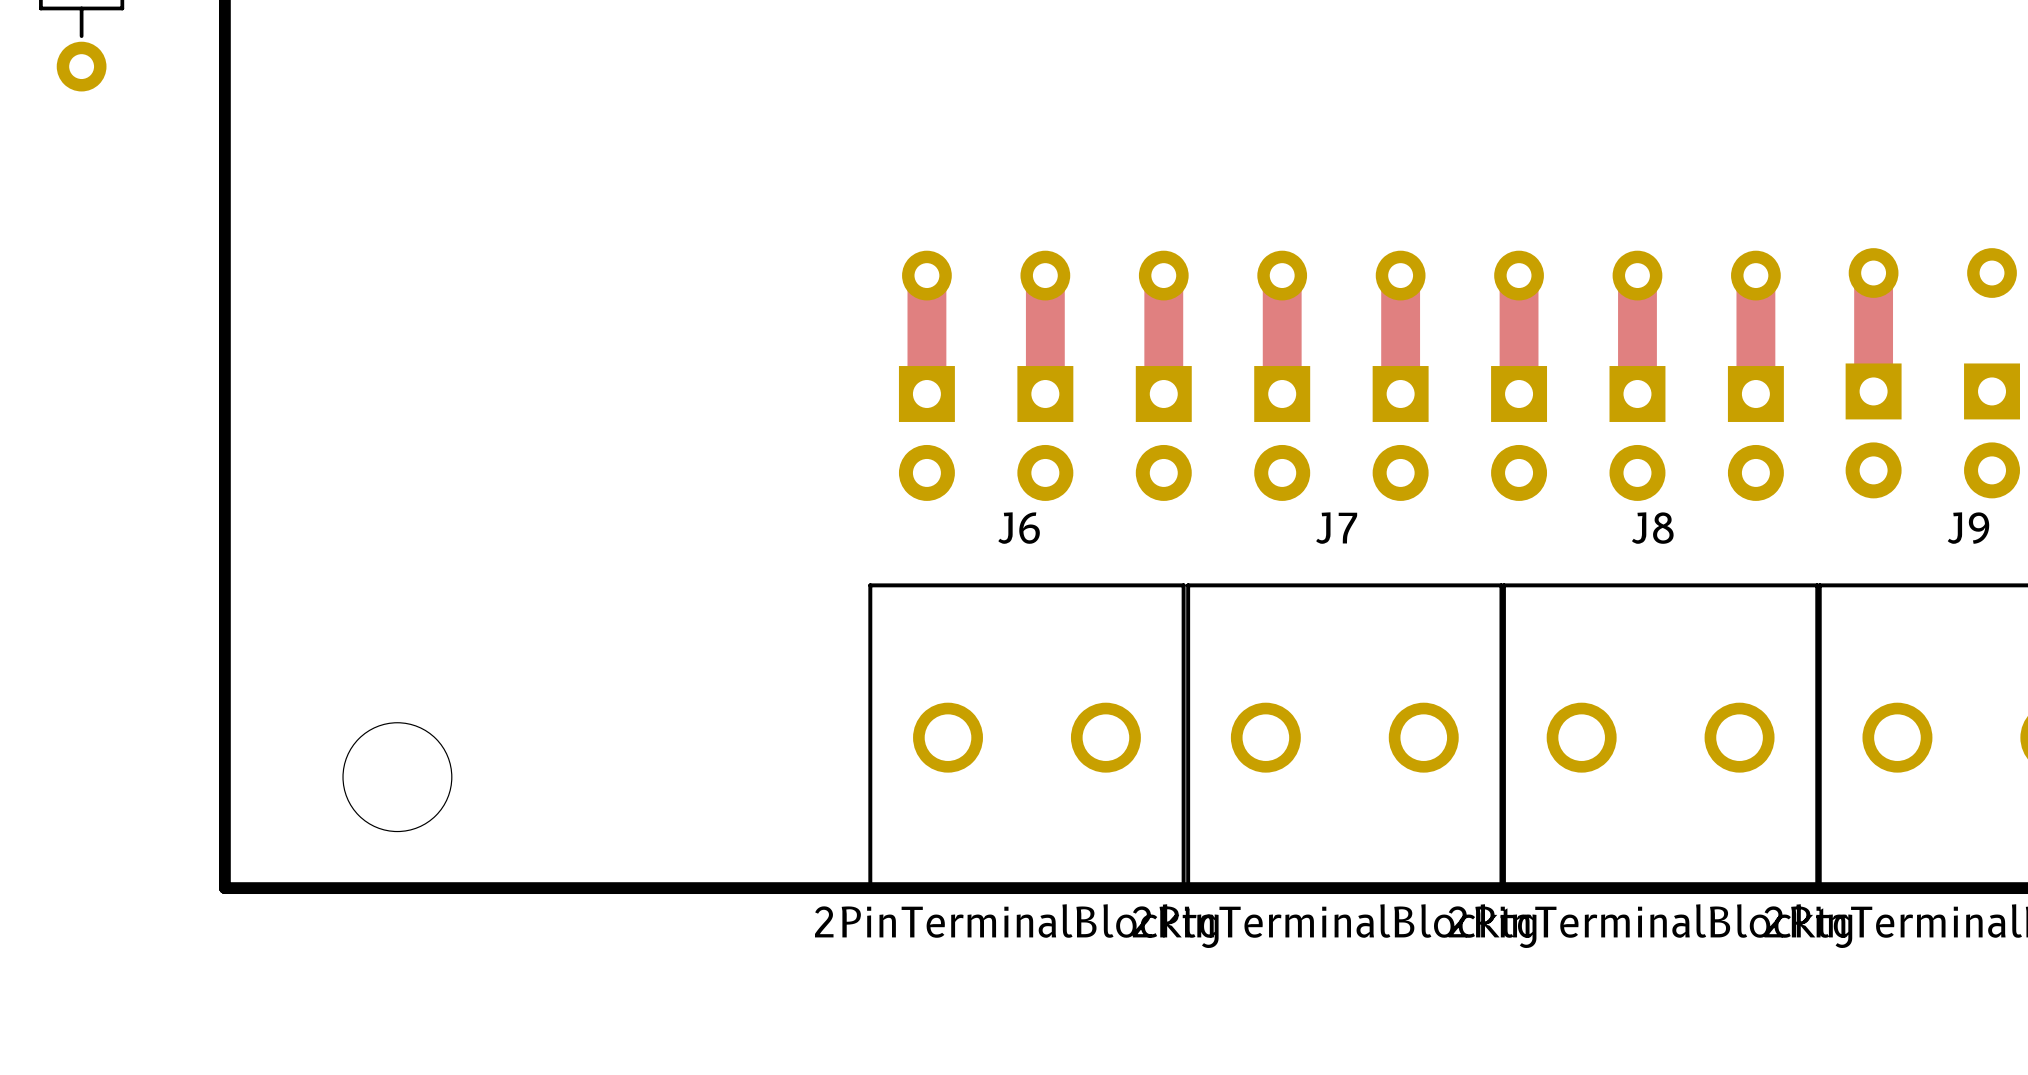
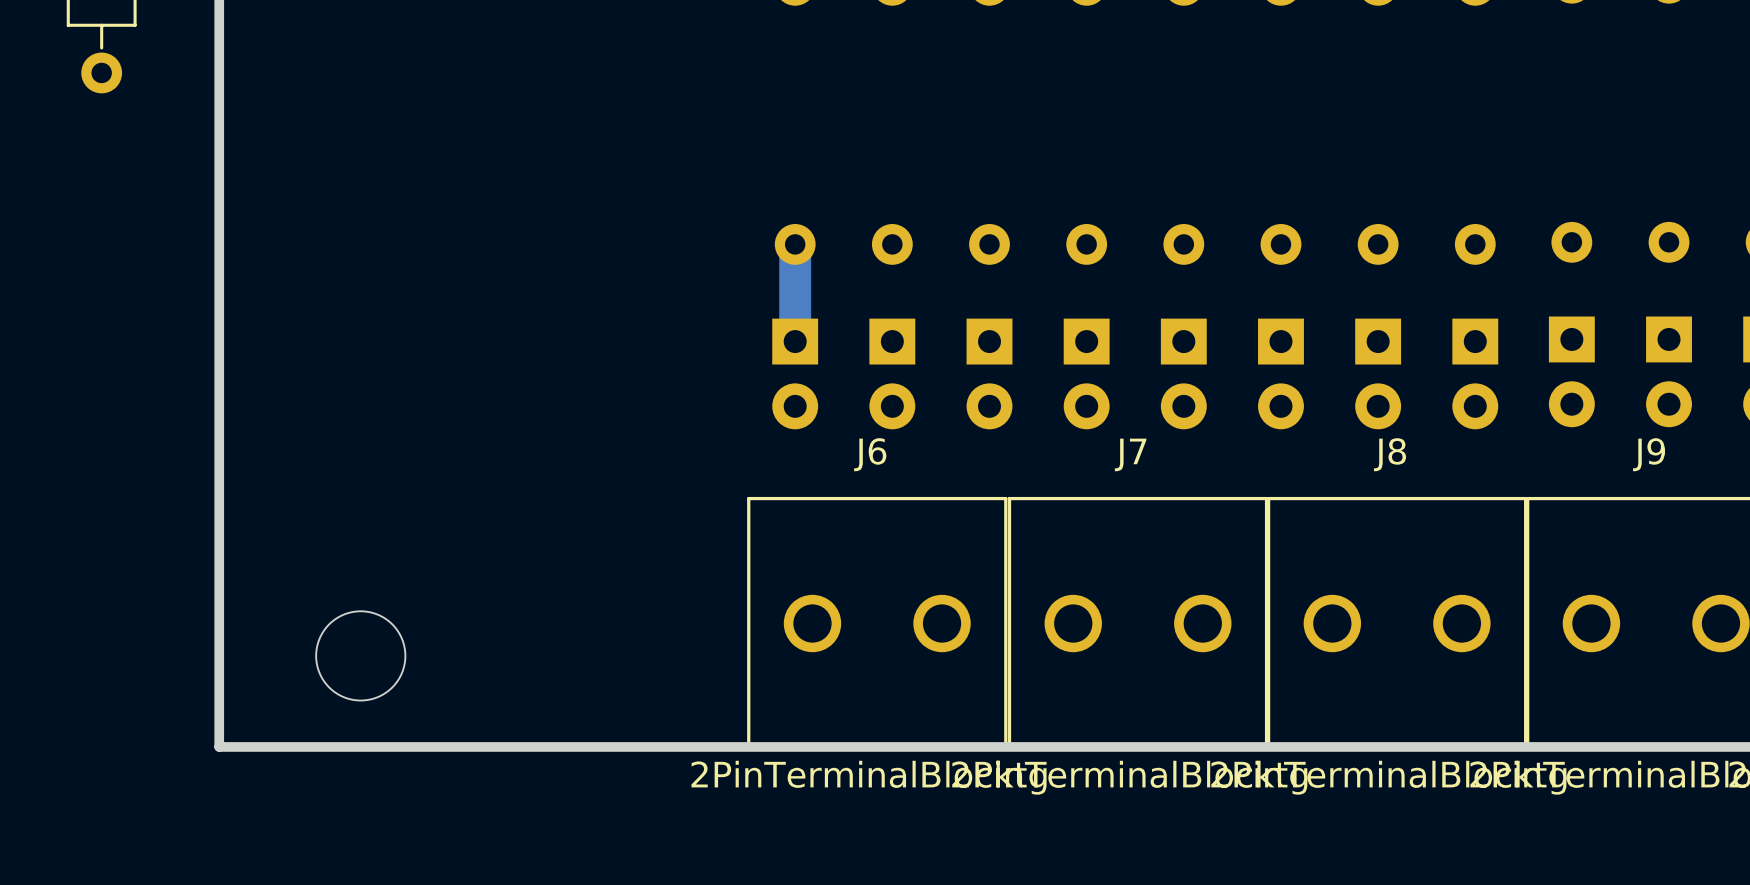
top track: (1873, 273) (1873, 391) -> none
top track: (926, 275) (926, 393) -> none
bottom track: none -> (795, 244) (795, 341)
top track: (1045, 275) (1045, 393) -> none
top track: (1163, 275) (1163, 393) -> none
top track: (1282, 275) (1282, 393) -> none
top track: (1400, 275) (1400, 393) -> none
top track: (1519, 275) (1519, 393) -> none
top track: (1637, 275) (1637, 393) -> none
top track: (1755, 275) (1755, 393) -> none

